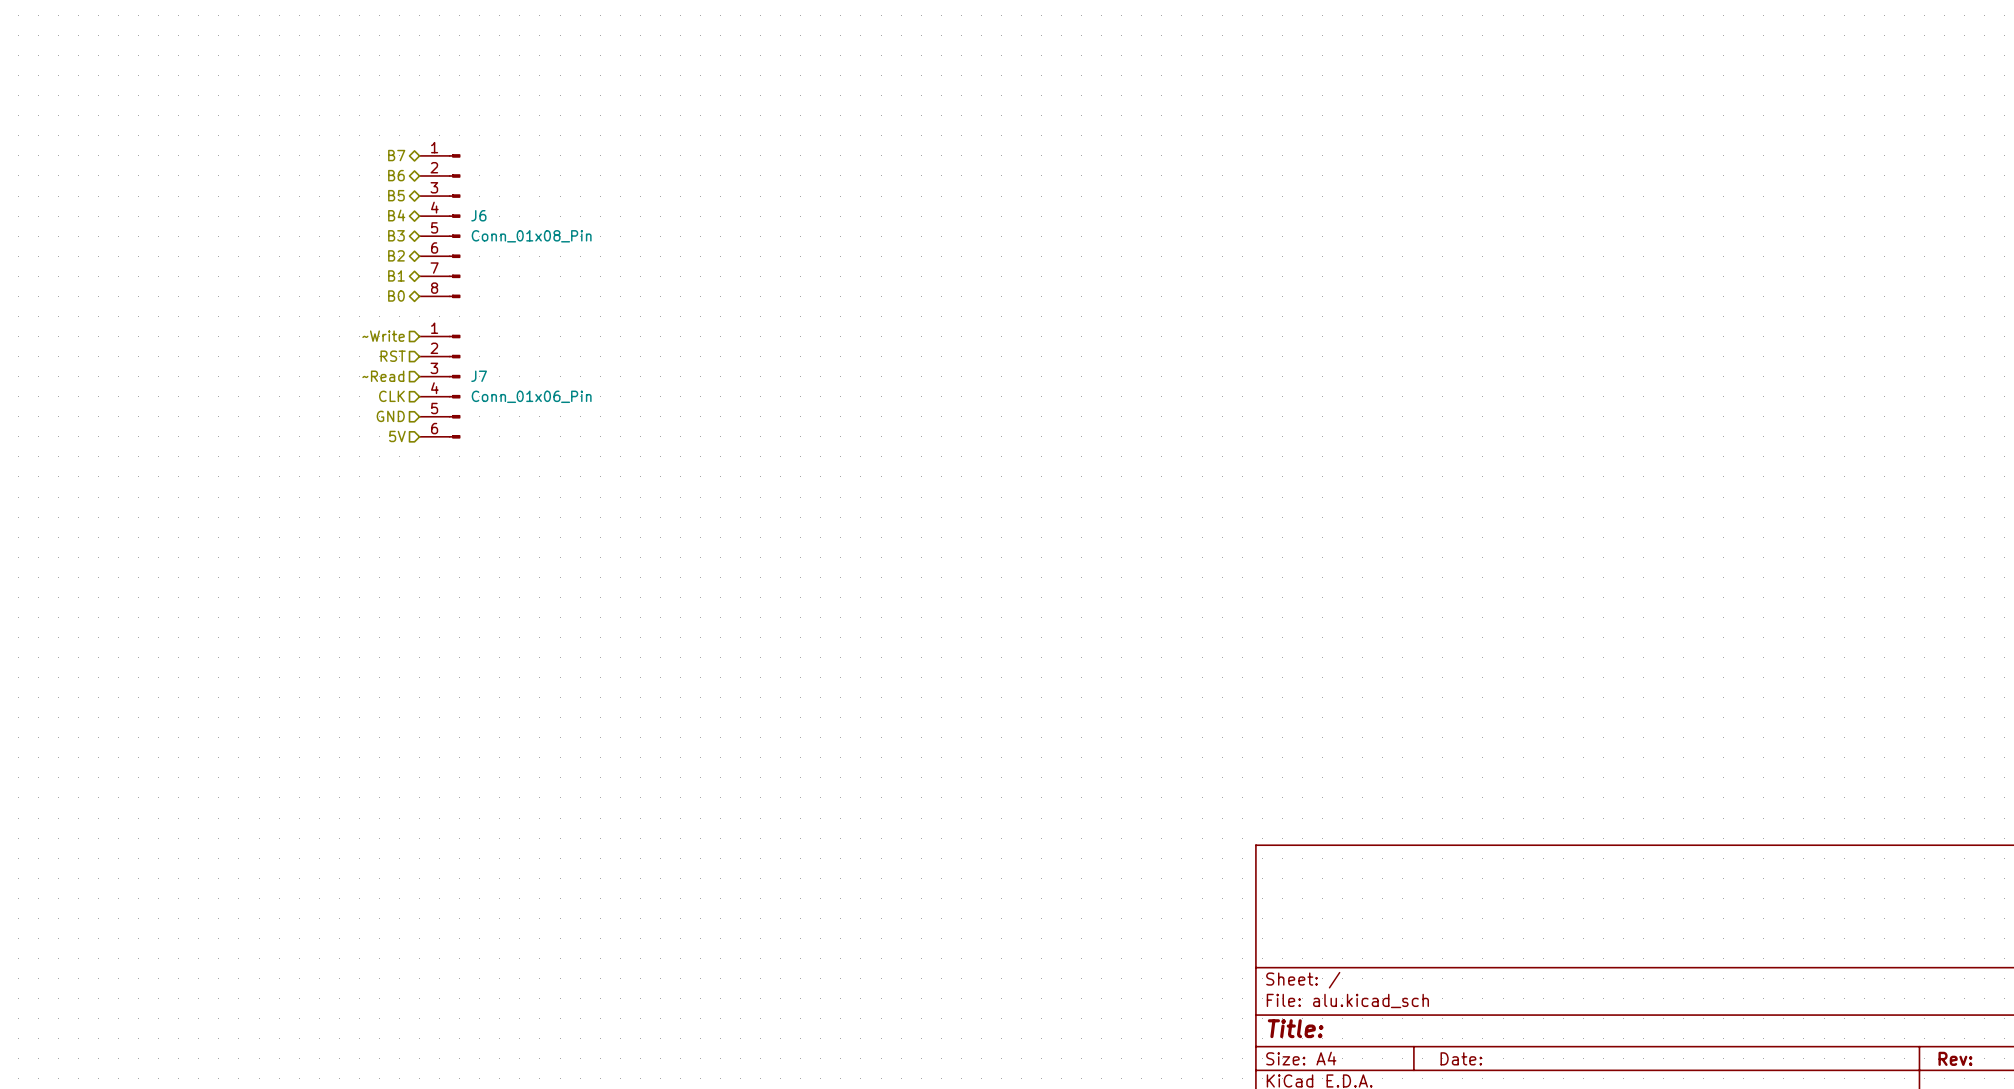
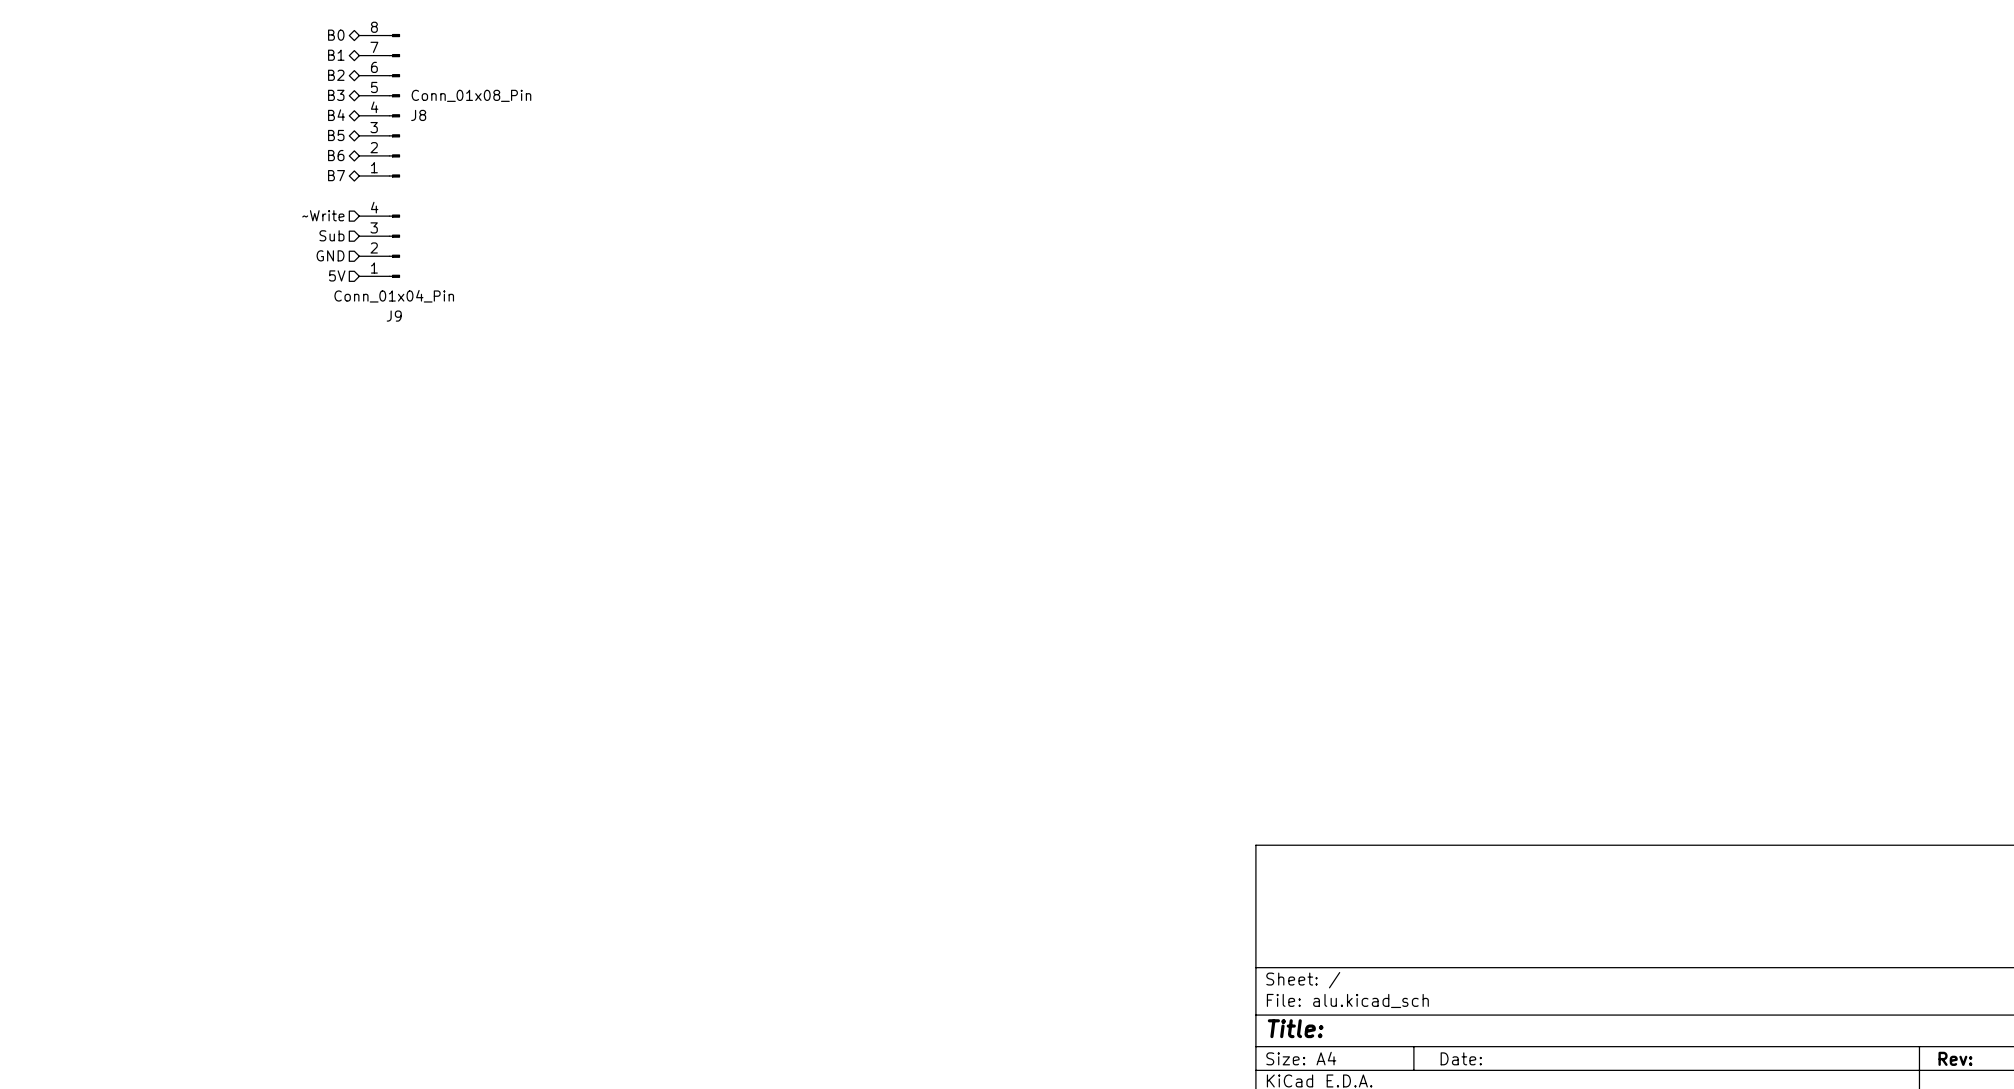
hierarchical label: none -> B0 (336, 35)
hierarchical label: none -> B1 (336, 55)
J8: none -> Conn_01x08_Pin (379, 105)
hierarchical label position: B7 (396, 155) -> B7 (336, 175)
hierarchical label position: B6 (396, 175) -> B6 (336, 155)
hierarchical label position: B5 (396, 195) -> B5 (336, 135)
hierarchical label position: B4 (396, 215) -> B4 (336, 115)
J6: Conn_01x08_Pin (439, 226) -> none
hierarchical label: none -> Sub (331, 235)
hierarchical label position: B3 (396, 235) -> B3 (336, 95)
J9: none -> Conn_01x04_Pin (379, 246)
hierarchical label position: B2 (396, 255) -> B2 (336, 75)
hierarchical label: B1 (396, 275) -> none
hierarchical label: B0 (396, 296) -> none
hierarchical label position: ~Write (383, 336) -> ~Write (323, 215)
hierarchical label: RST (393, 356) -> none
hierarchical label: ~Read (383, 376) -> none
J7: Conn_01x06_Pin (439, 386) -> none
hierarchical label: CLK (391, 396) -> none
hierarchical label position: GND (390, 416) -> GND (330, 255)
hierarchical label position: 5V (397, 436) -> 5V (337, 275)

